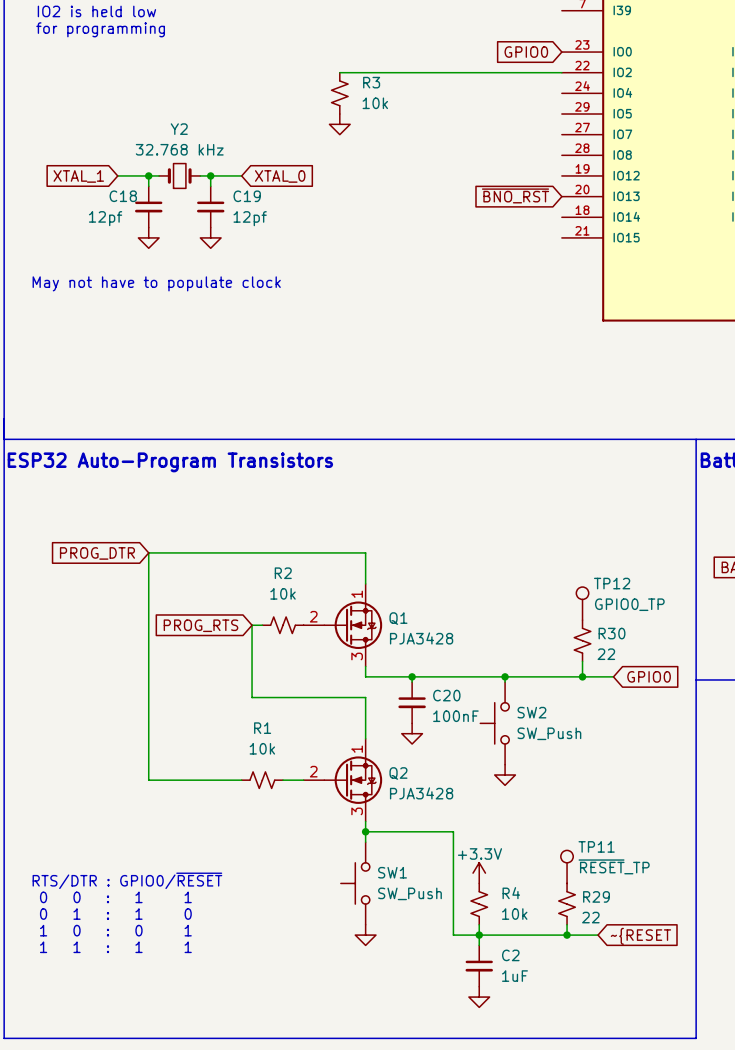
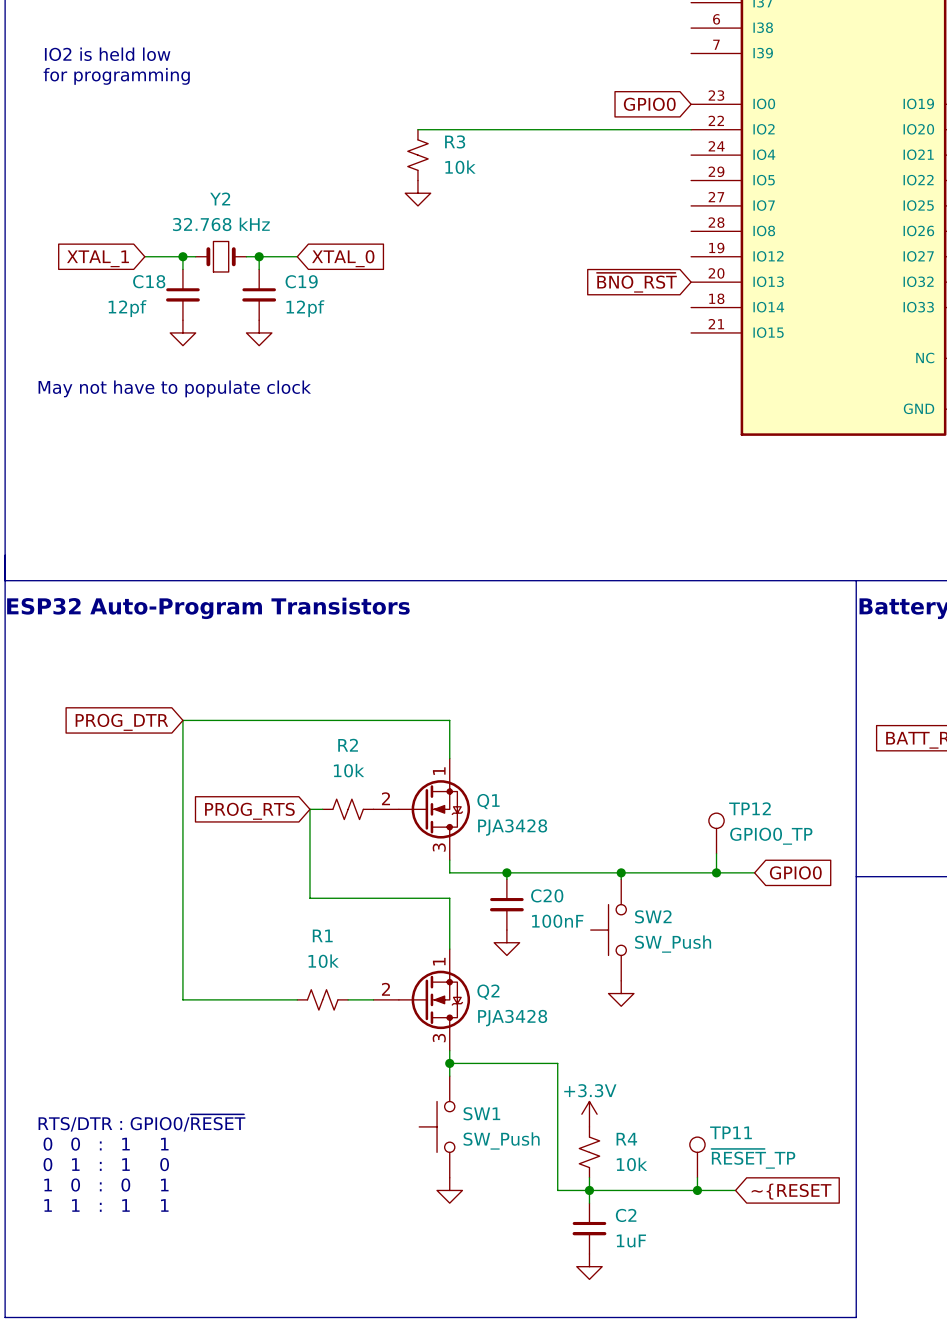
TP12 position: (582, 603) -> (716, 833)
R30: 22 (582, 640) -> none
TP11 position: (567, 866) -> (697, 1157)
R29: 22 (567, 904) -> none

